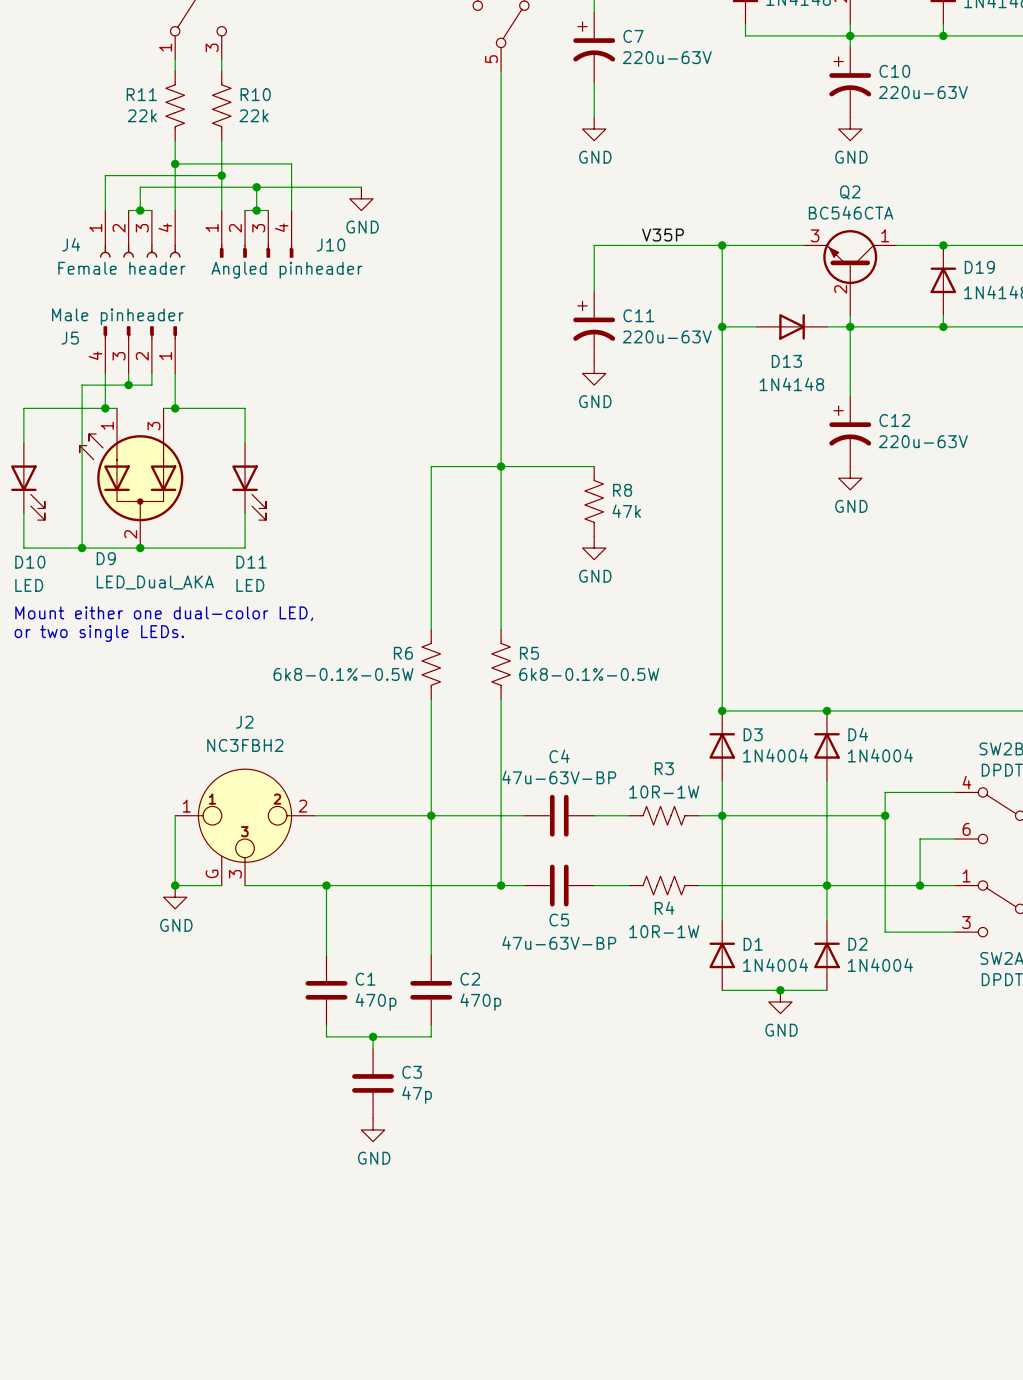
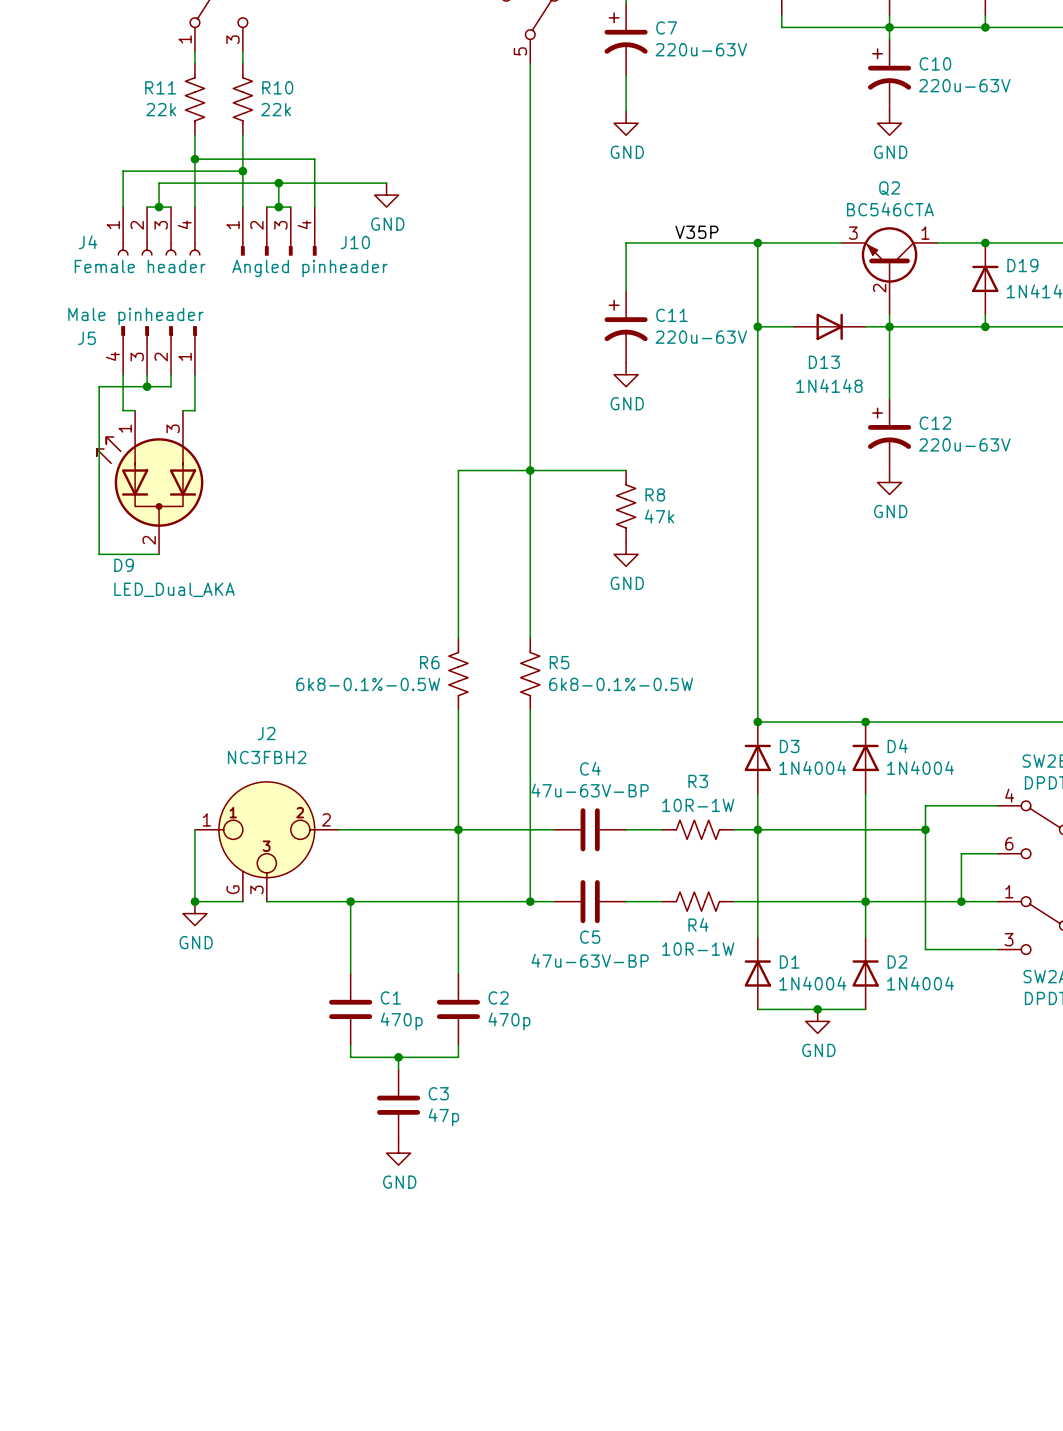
wire: (105, 408) (23, 408) (23, 443) -> none
junction: (105, 408) -> none
wire: (175, 408) (245, 408) (245, 443) -> none
junction: (175, 408) -> none
D10: LED (27, 481) -> none
D11: LED (249, 481) -> none
wire: (23, 513) (23, 548) (82, 548) -> none
wire: (245, 513) (245, 548) (140, 548) -> none
junction: (82, 548) -> none
junction: (140, 548) -> none
text: Mount either one dual-color LED, (164, 613) -> none
text: or two single LEDs. (99, 633) -> none

